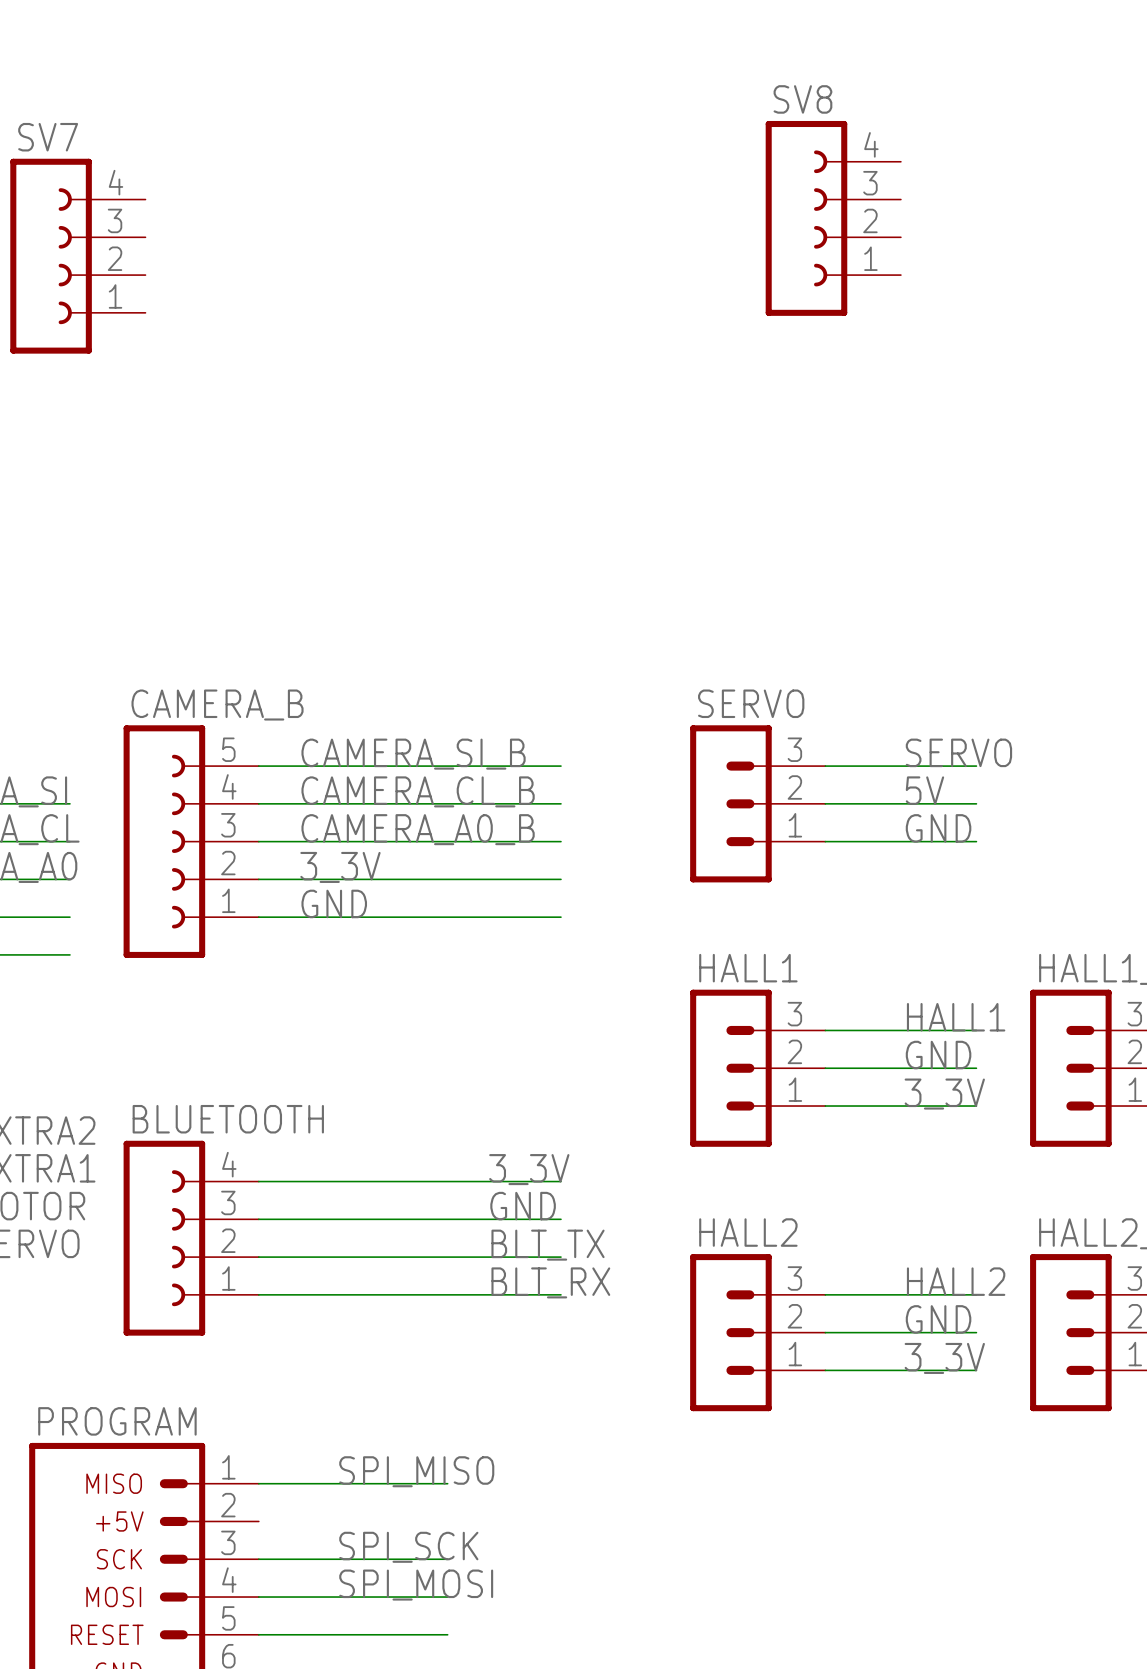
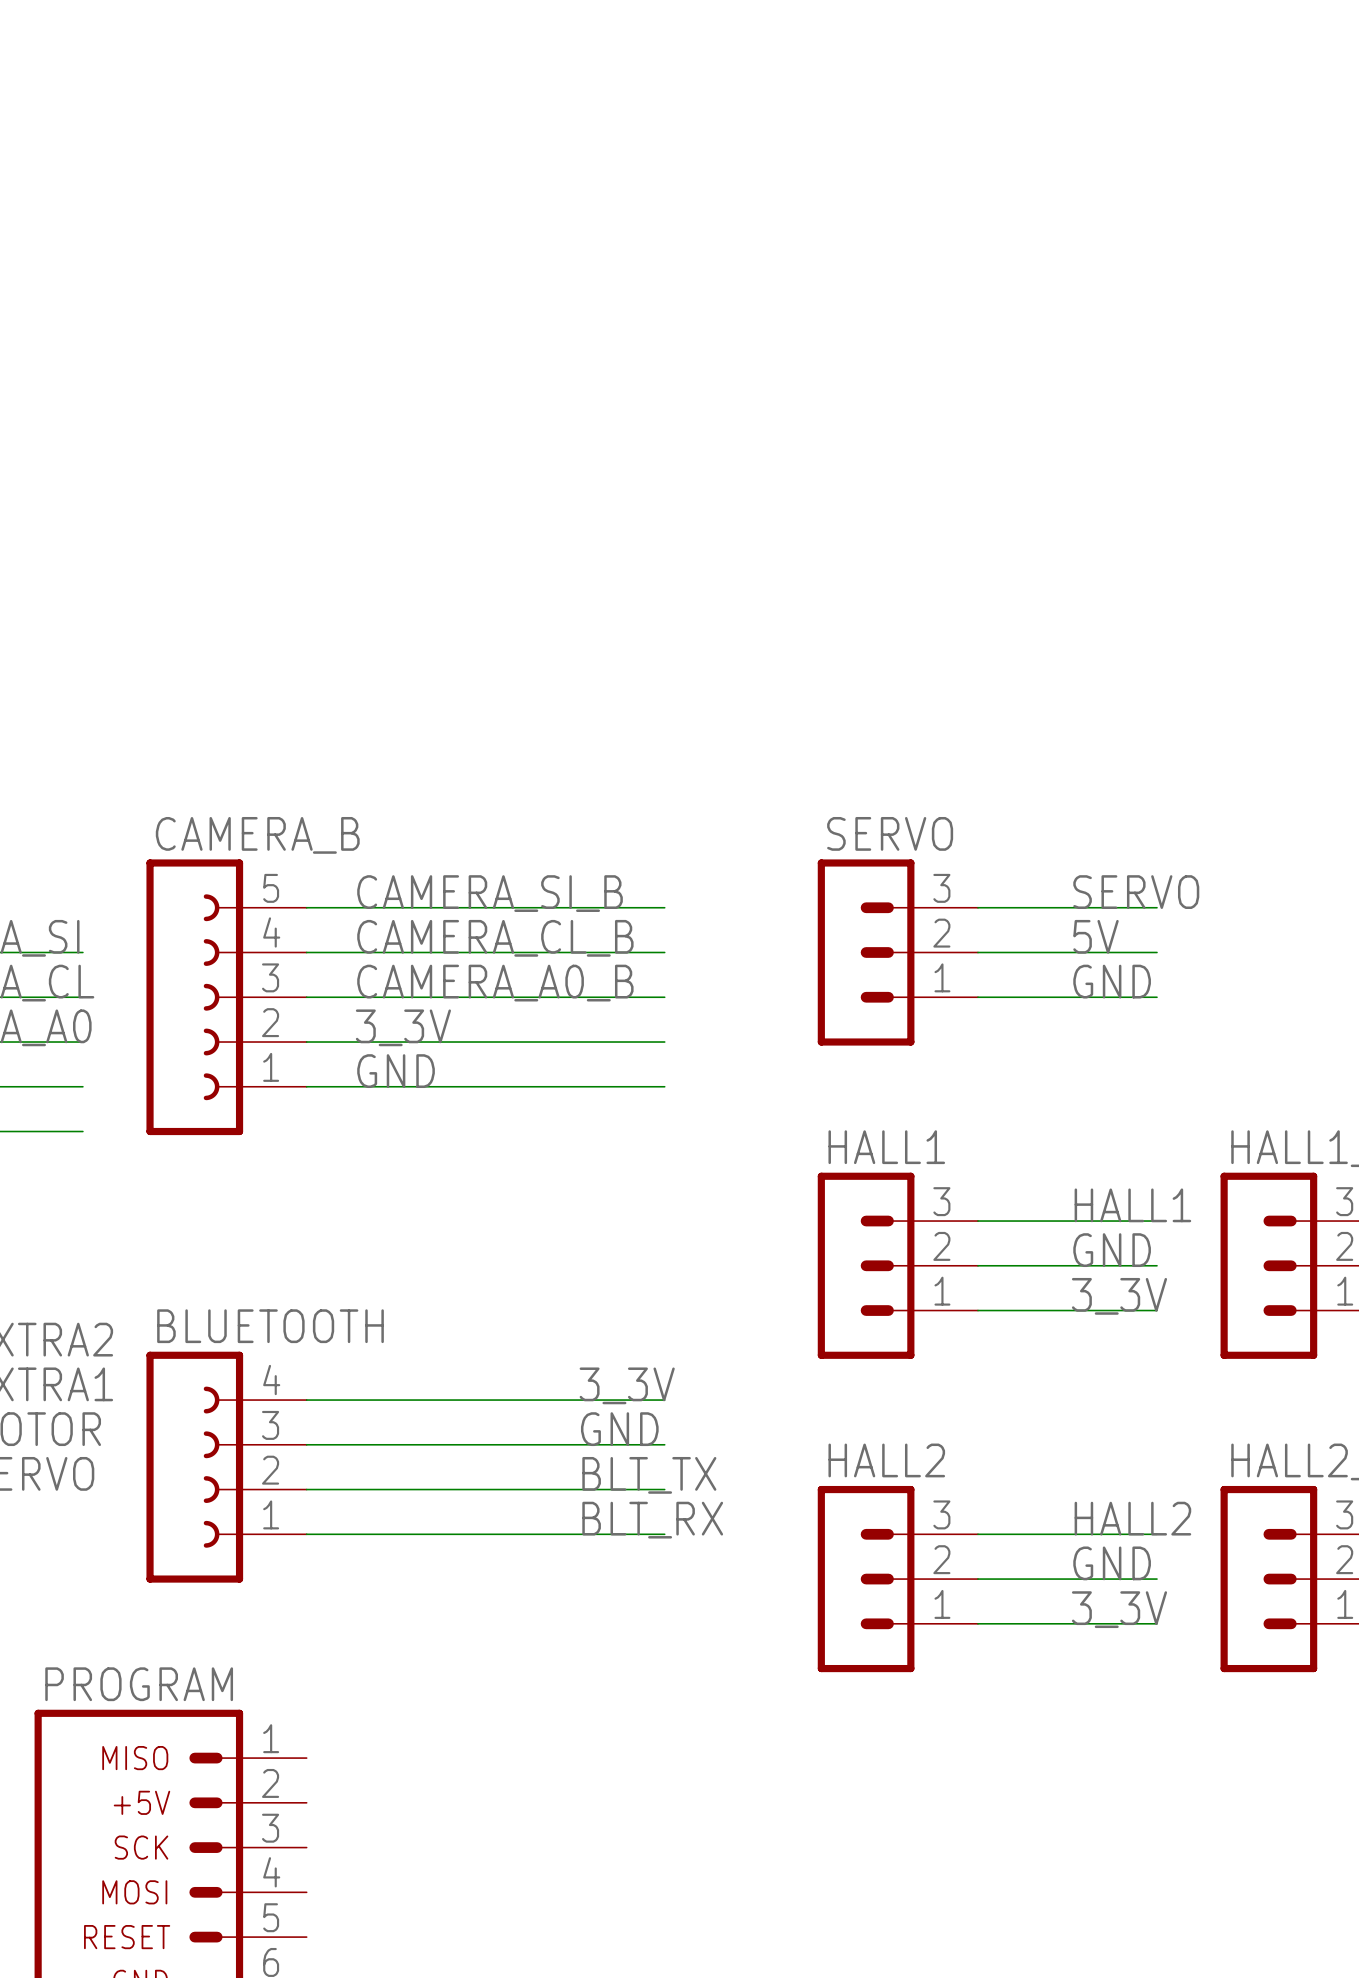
SV8: (833, 218) -> none
SV7: (77, 256) -> none
label: SPI_MISO (416, 1471) -> none
wire: (258, 1483) (447, 1483) -> none
label: SPI_SCK (408, 1547) -> none
wire: (258, 1559) (447, 1559) -> none
label: SPI_MOSI (416, 1585) -> none
wire: (258, 1597) (447, 1597) -> none
wire: (258, 1634) (447, 1634) -> none

